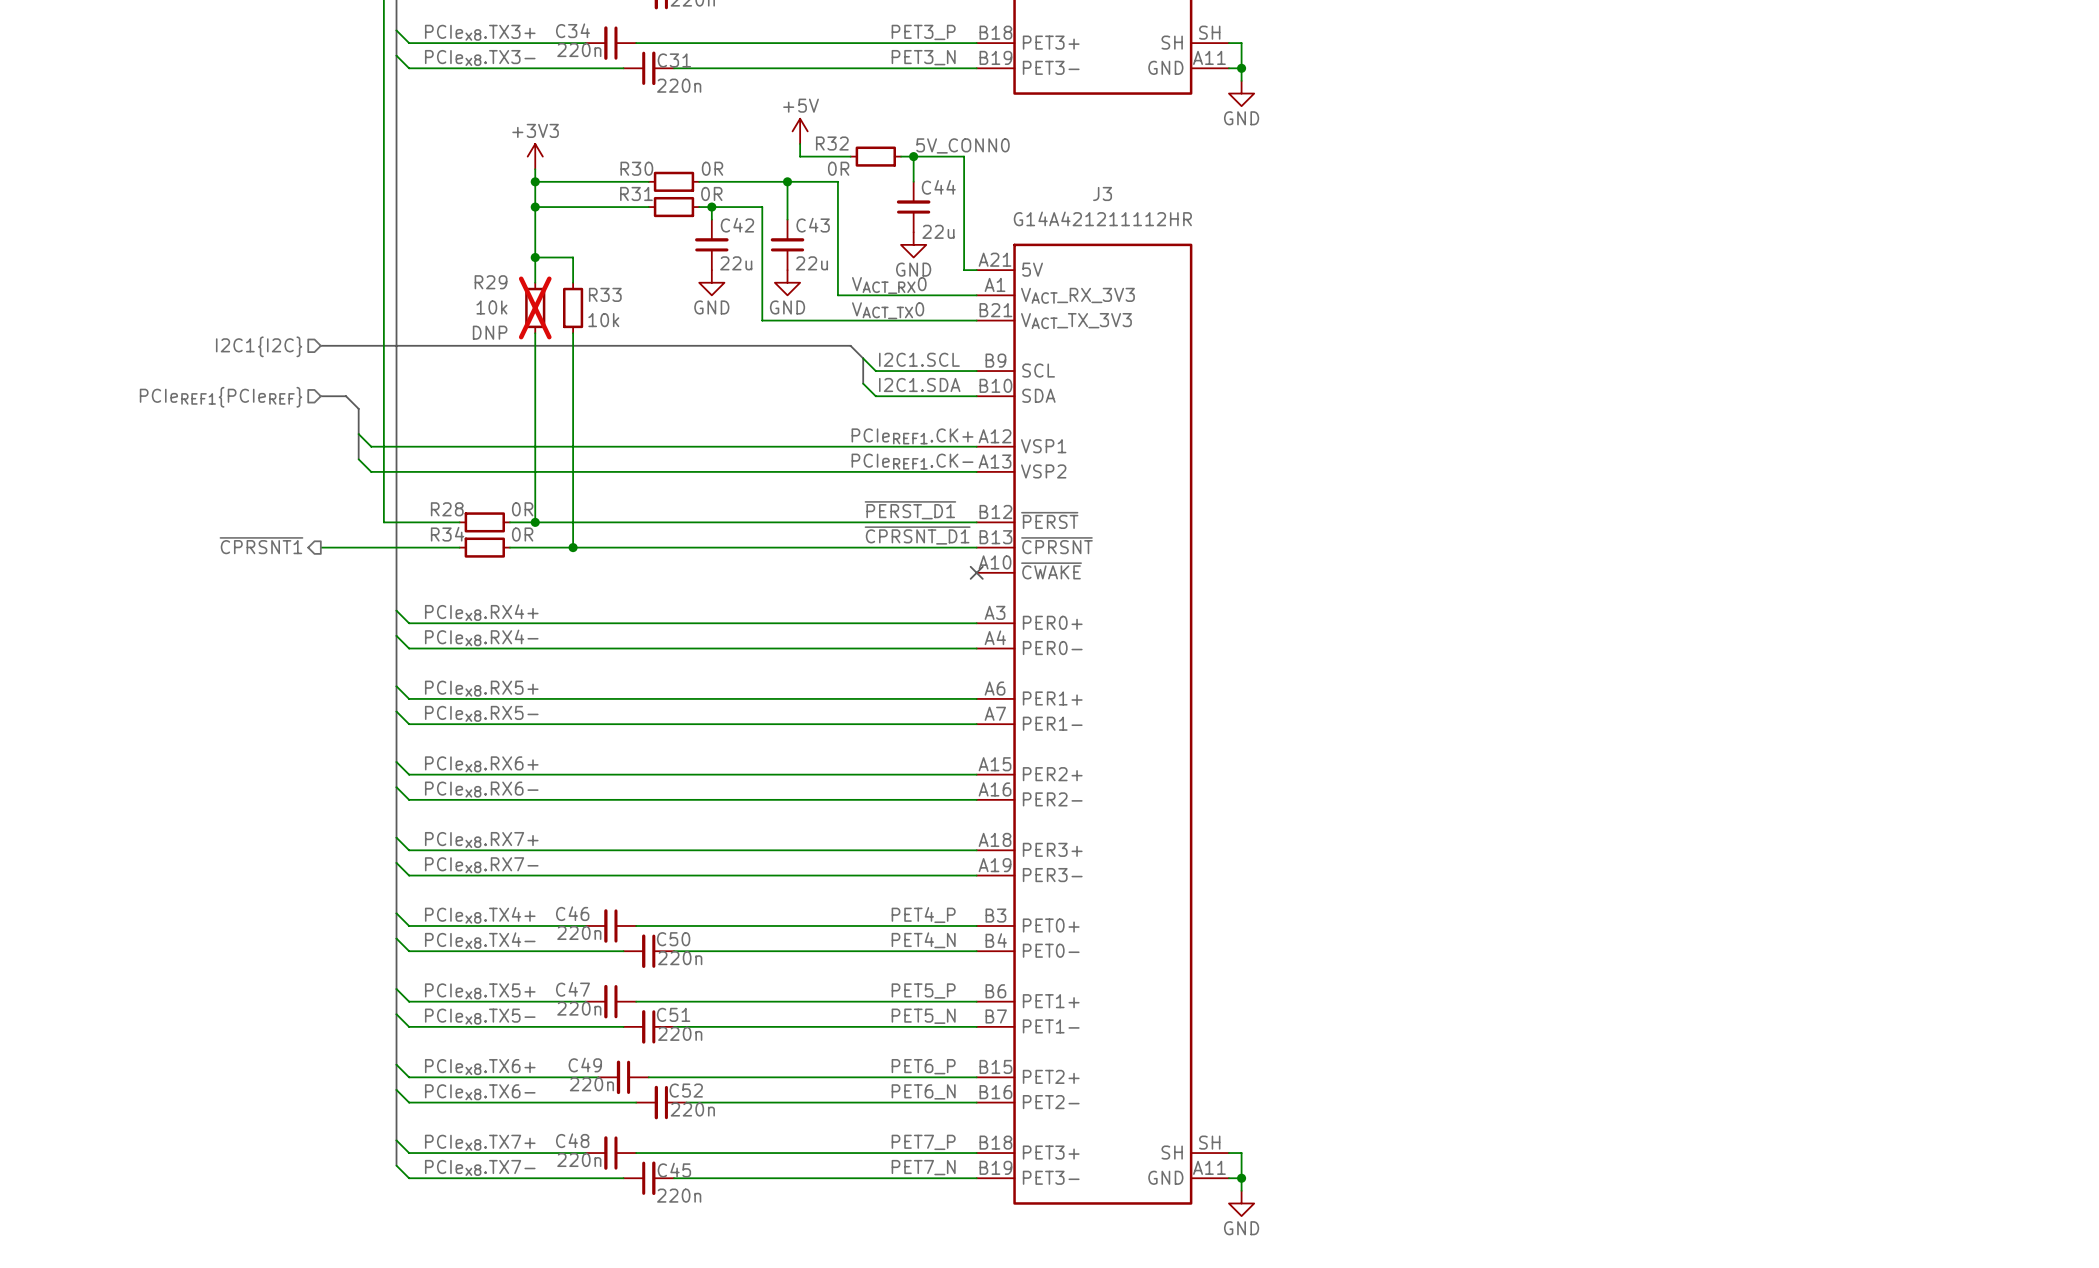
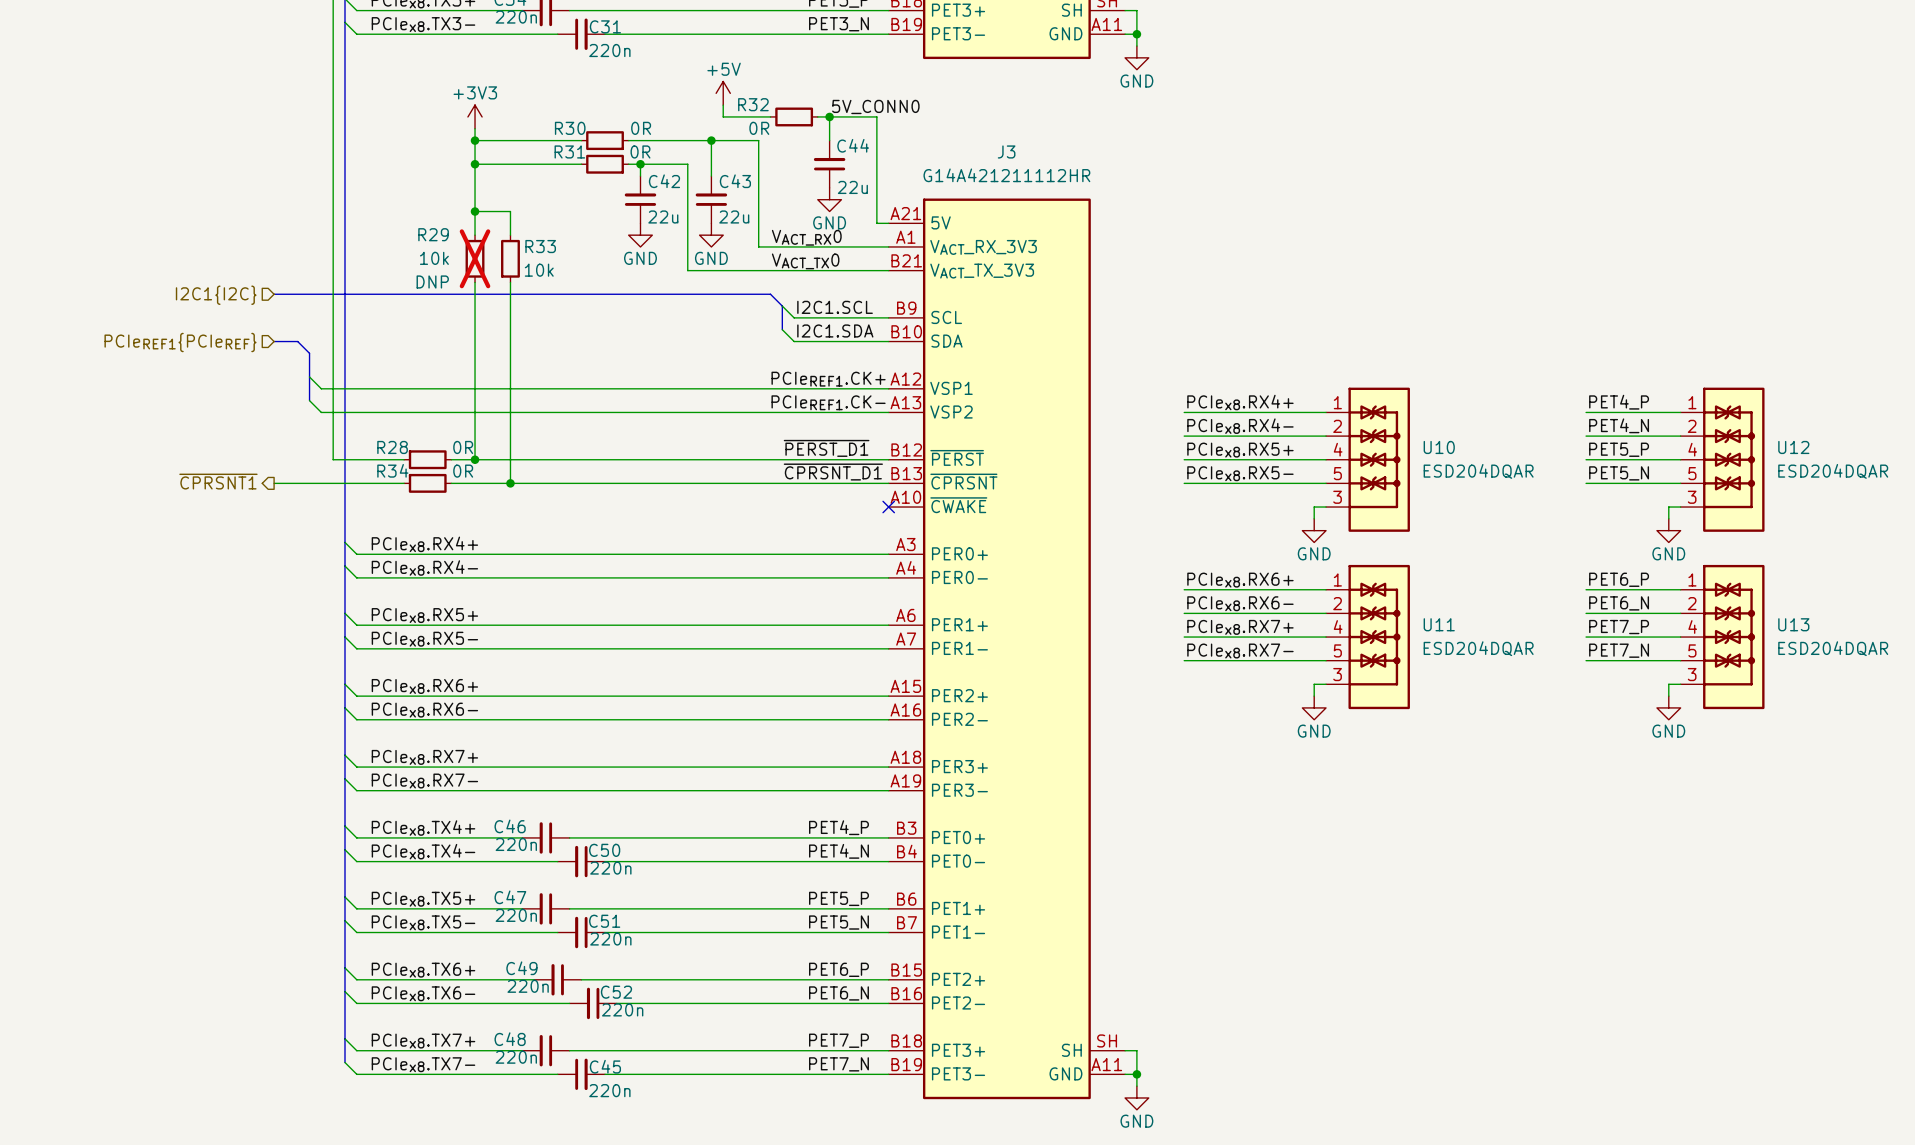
label: none -> PET4_P (1619, 402)
label: none -> PCIex8.RX4+ (1240, 402)
wire: none -> (1184, 412) (1326, 412)
wire: none -> (1586, 412) (1680, 412)
label: none -> PCIex8.RX4- (1240, 426)
label: none -> PET4_N (1619, 425)
wire: none -> (1184, 436) (1326, 436)
wire: none -> (1586, 436) (1680, 436)
label: none -> PET5_P (1619, 449)
label: none -> PCIex8.RX5+ (1240, 450)
wire: none -> (1184, 459) (1326, 459)
U10: none -> (1367, 459)
wire: none -> (1586, 459) (1680, 459)
U12: none -> (1722, 459)
label: none -> PET5_N (1619, 473)
label: none -> PCIex8.RX5- (1240, 473)
wire: none -> (1184, 483) (1326, 483)
wire: none -> (1586, 483) (1680, 483)
wire: none -> (1326, 507) (1314, 507) (1314, 518)
wire: none -> (1680, 507) (1668, 507) (1668, 518)
power symbol: none -> GND (1314, 530)
power symbol: none -> GND (1668, 530)
label: none -> PCIex8.RX6+ (1240, 580)
label: none -> PET6_P (1619, 579)
wire: none -> (1184, 589) (1326, 589)
wire: none -> (1586, 589) (1680, 589)
label: none -> PET6_N (1619, 603)
label: none -> PCIex8.RX6- (1240, 603)
wire: none -> (1184, 613) (1326, 613)
wire: none -> (1586, 613) (1680, 613)
label: none -> PET7_P (1619, 627)
label: none -> PCIex8.RX7+ (1240, 627)
wire: none -> (1184, 637) (1326, 637)
U11: none -> (1367, 637)
wire: none -> (1586, 637) (1680, 637)
U13: none -> (1722, 637)
label: none -> PCIex8.RX7- (1240, 651)
label: none -> PET7_N (1619, 650)
wire: none -> (1184, 660) (1326, 660)
wire: none -> (1586, 660) (1680, 660)
wire: none -> (1326, 684) (1314, 684) (1314, 696)
wire: none -> (1680, 684) (1668, 684) (1668, 696)
power symbol: none -> GND (1314, 707)
power symbol: none -> GND (1668, 707)

